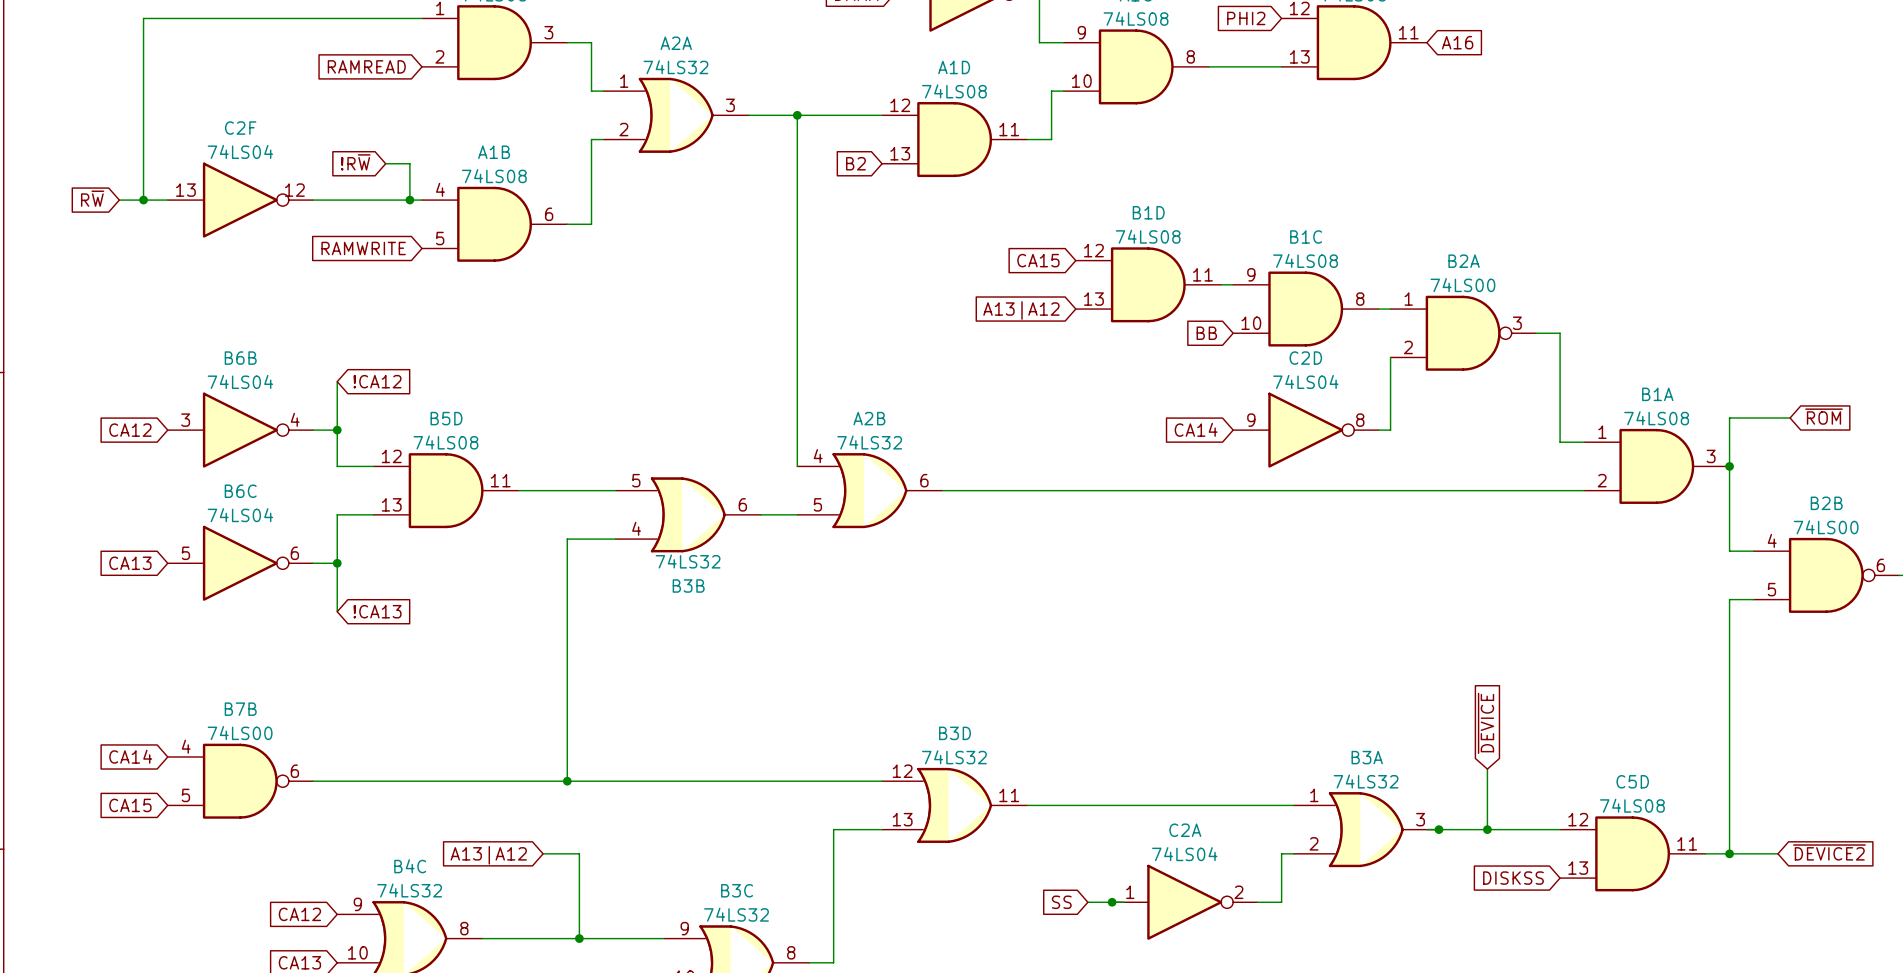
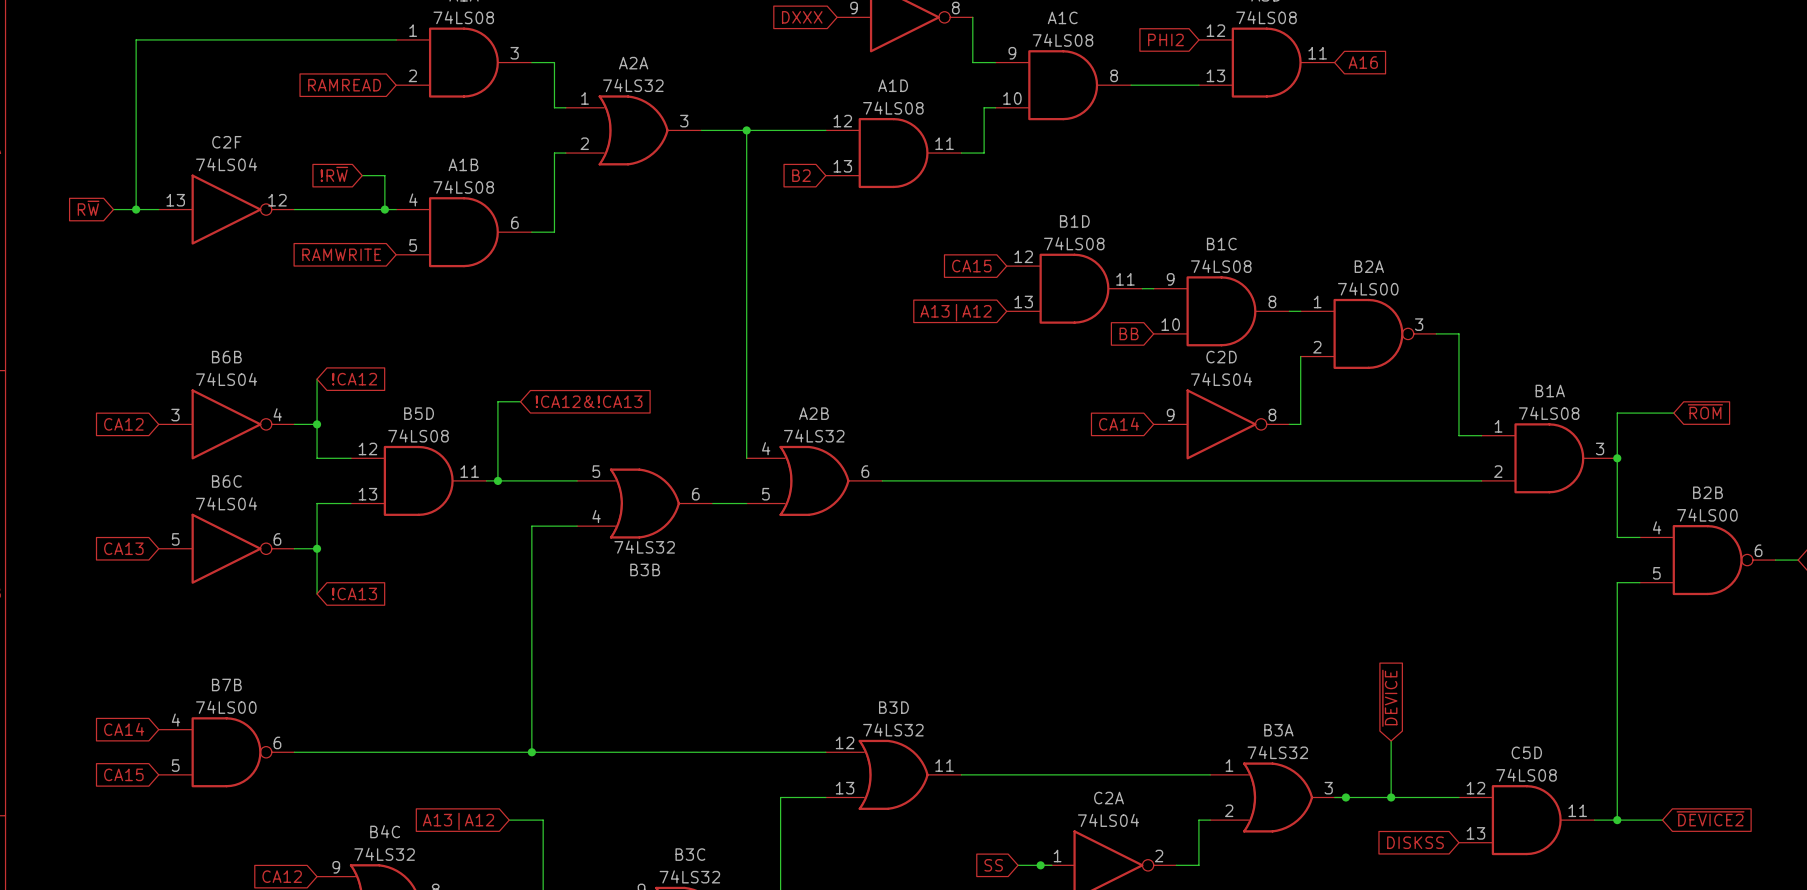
wire: none -> (520, 401) (497, 401) (497, 480)
global label: none -> !CA12&!CA13 (589, 401)
junction: none -> (497, 480)

